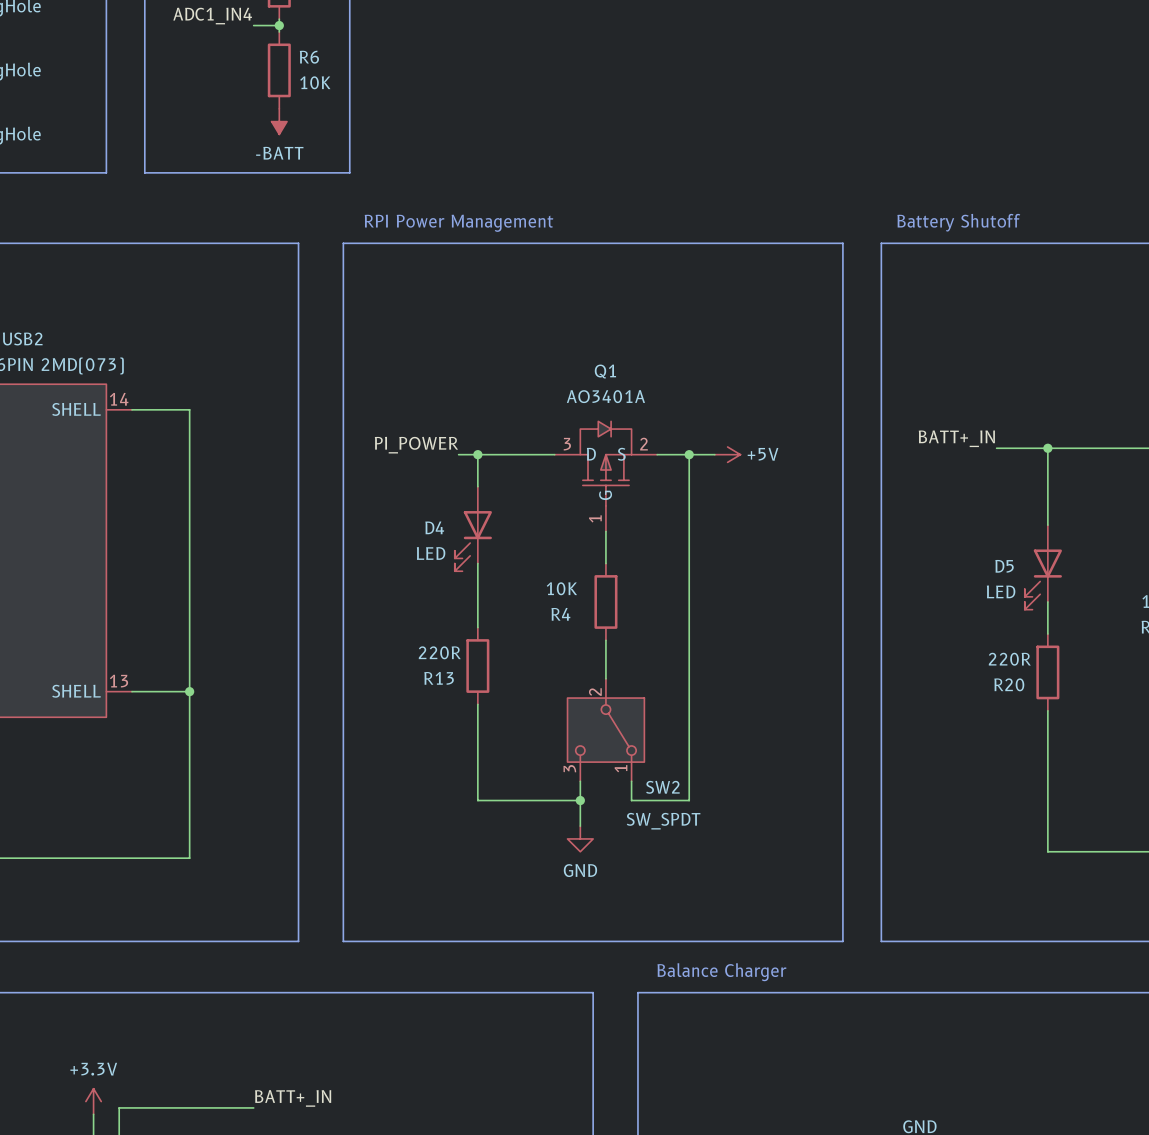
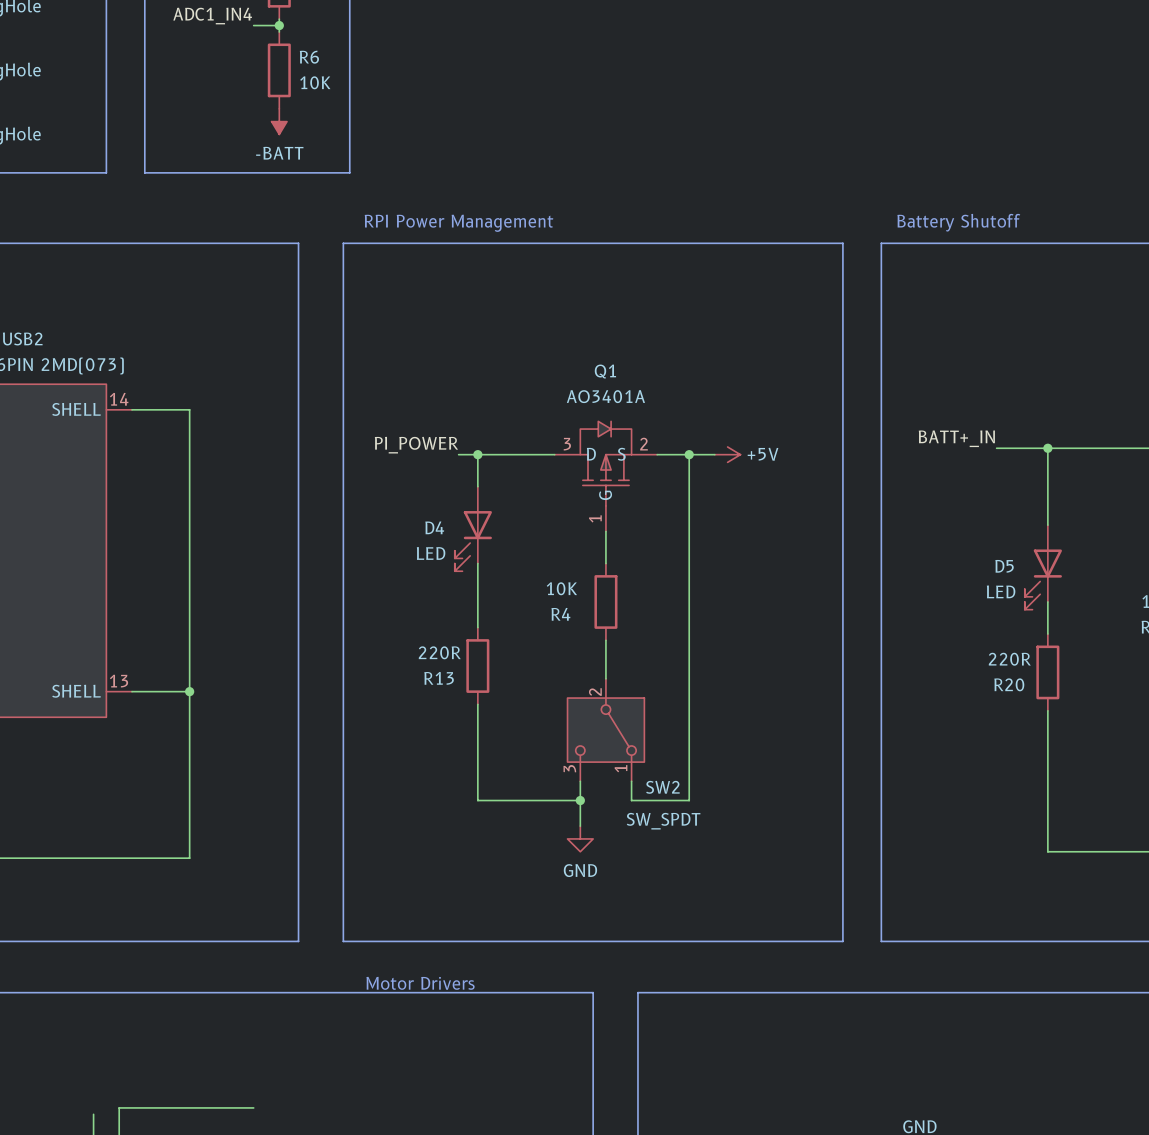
text: Balance Charger (721, 972) -> none
text: none -> Motor Drivers (420, 983)
label: BATT+_IN (293, 1098) -> none
power symbol: +3.3V (93, 1101) -> none

